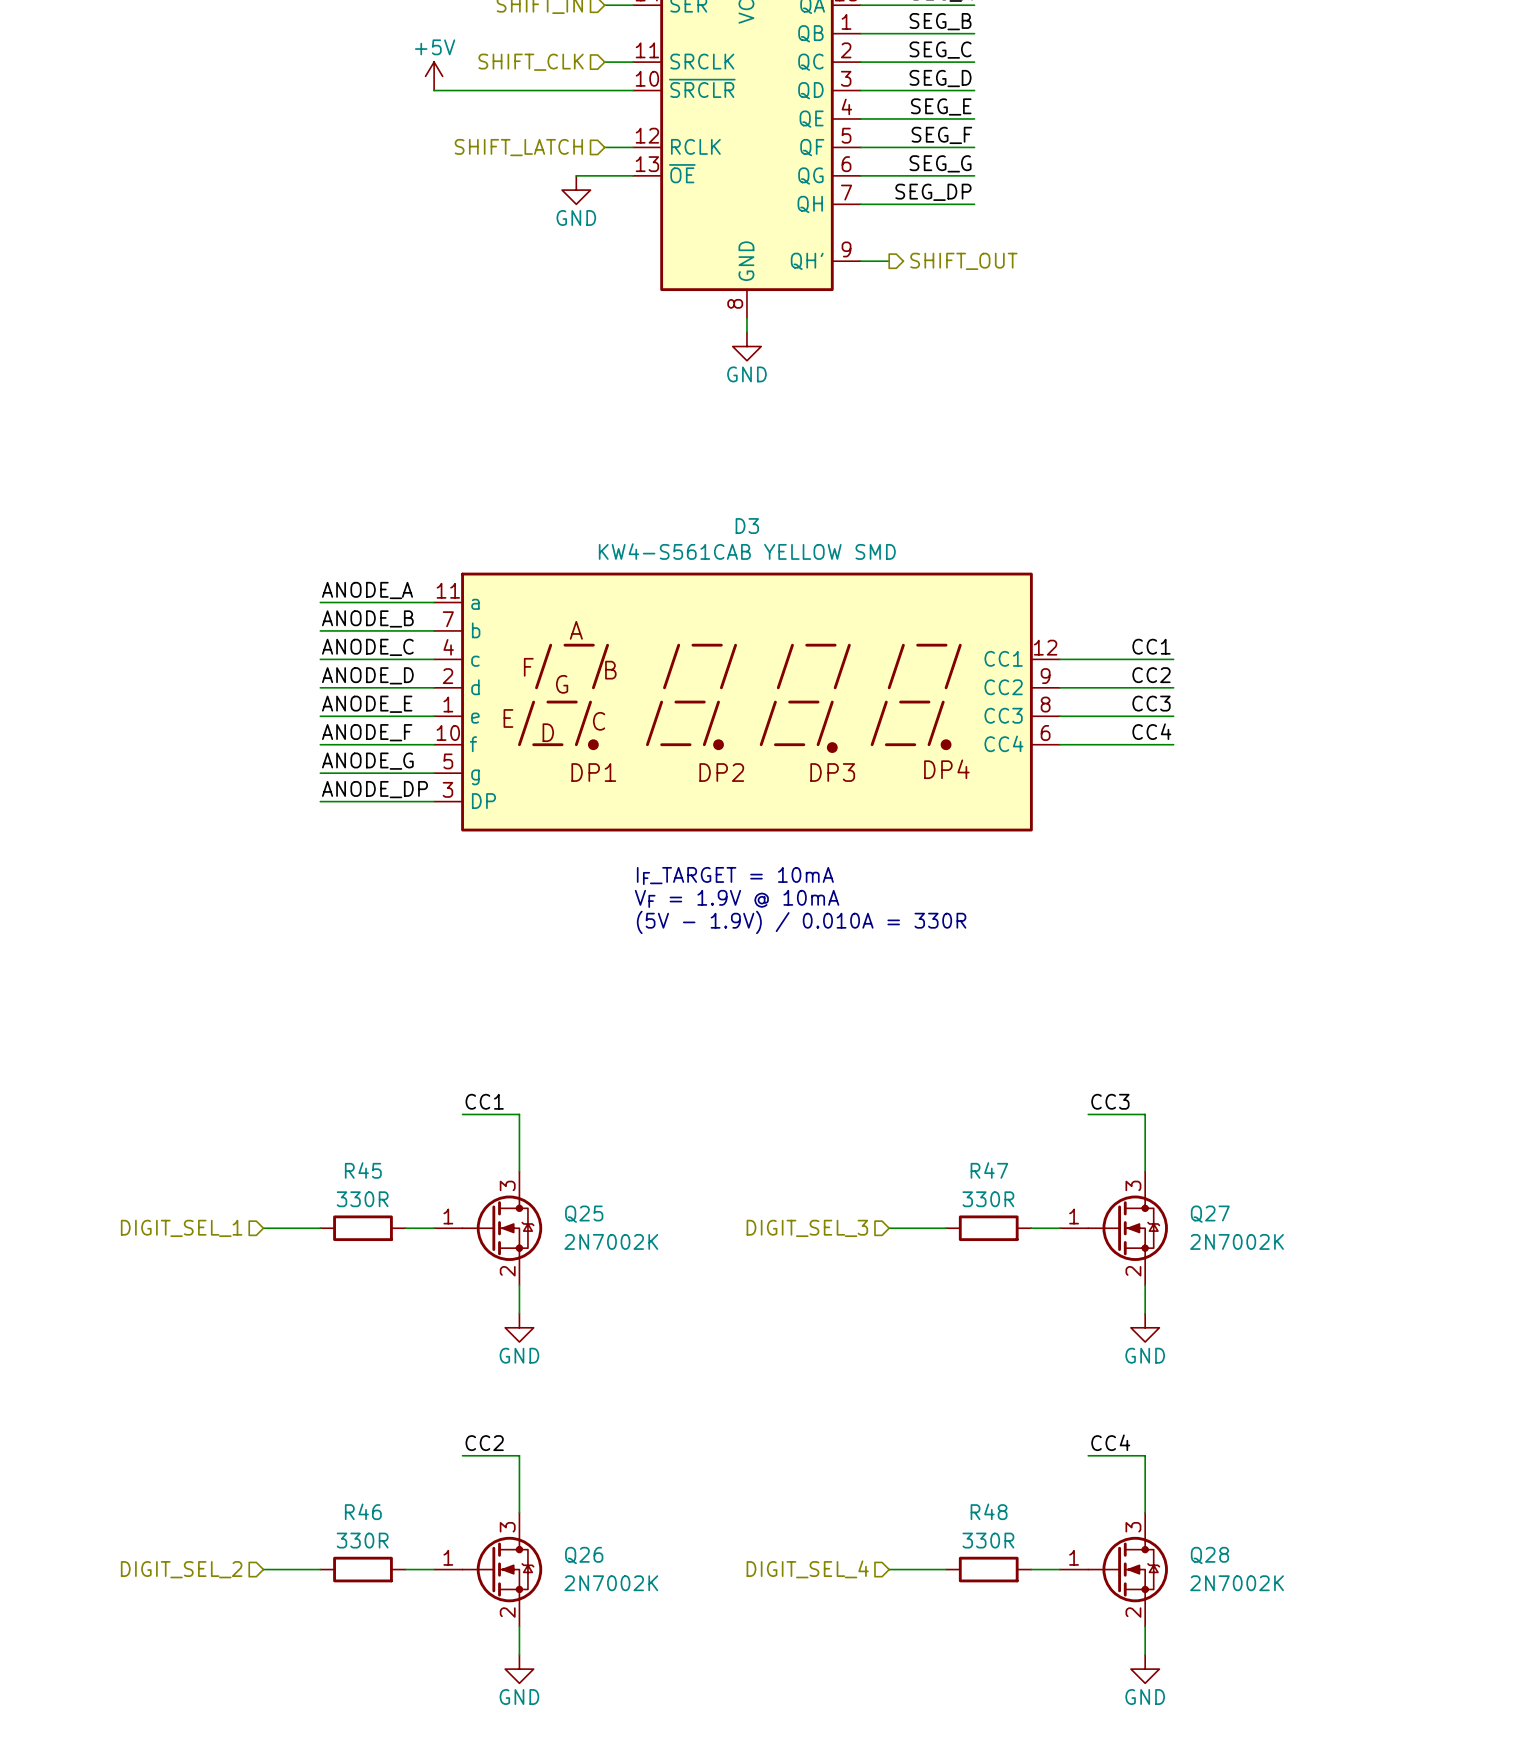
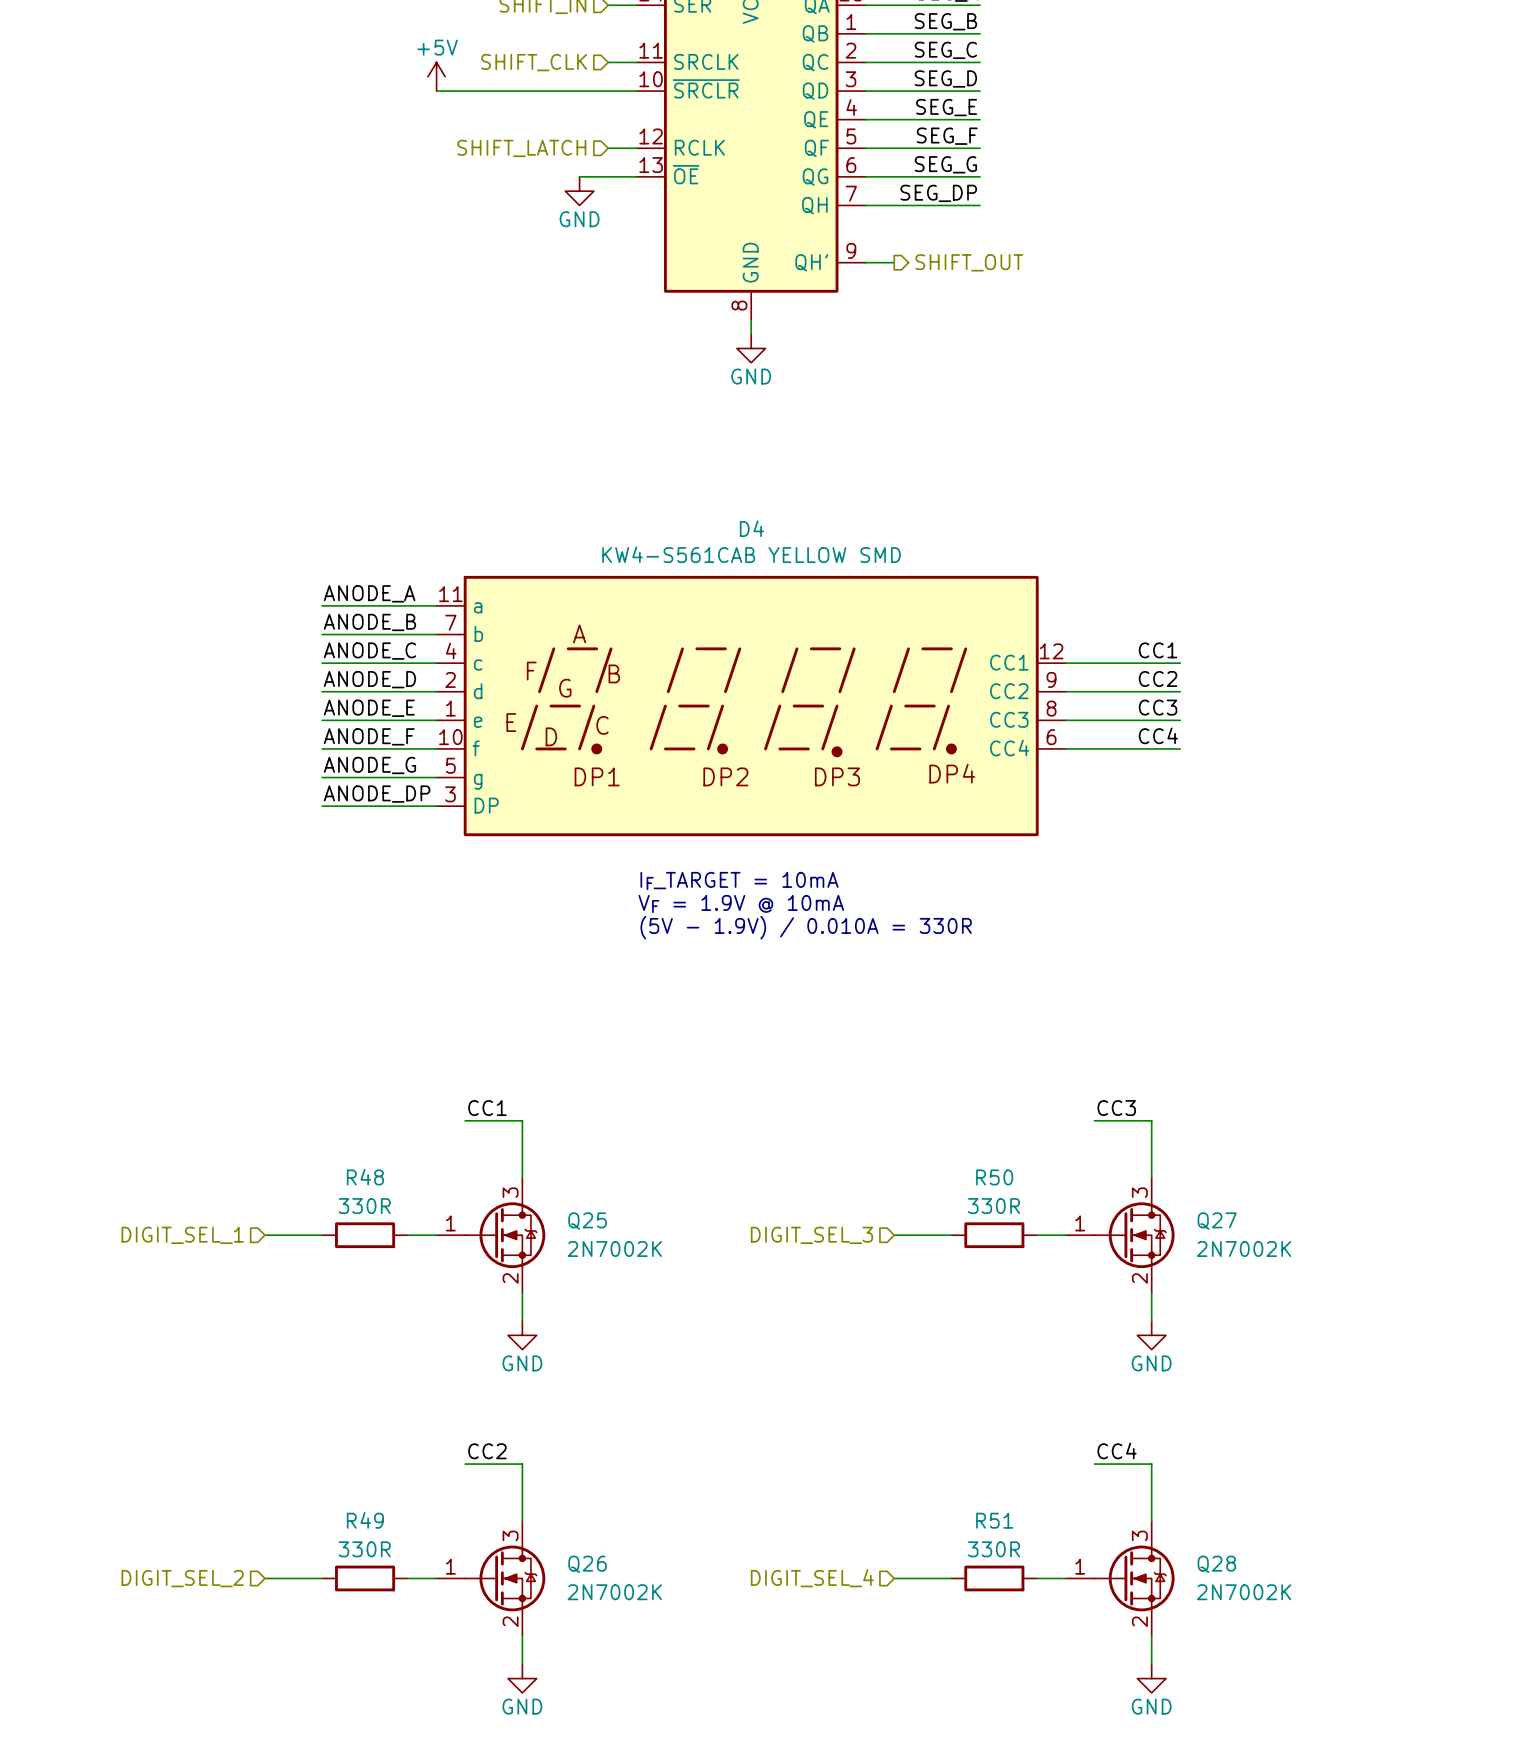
D3 name: D3 (747, 526) -> D4 (751, 528)
R45 name: R45 (363, 1170) -> R48 (365, 1177)
R47 name: R47 (989, 1170) -> R50 (994, 1177)
R46 name: R46 (363, 1511) -> R49 (365, 1520)
R48 name: R48 (989, 1511) -> R51 (994, 1520)

